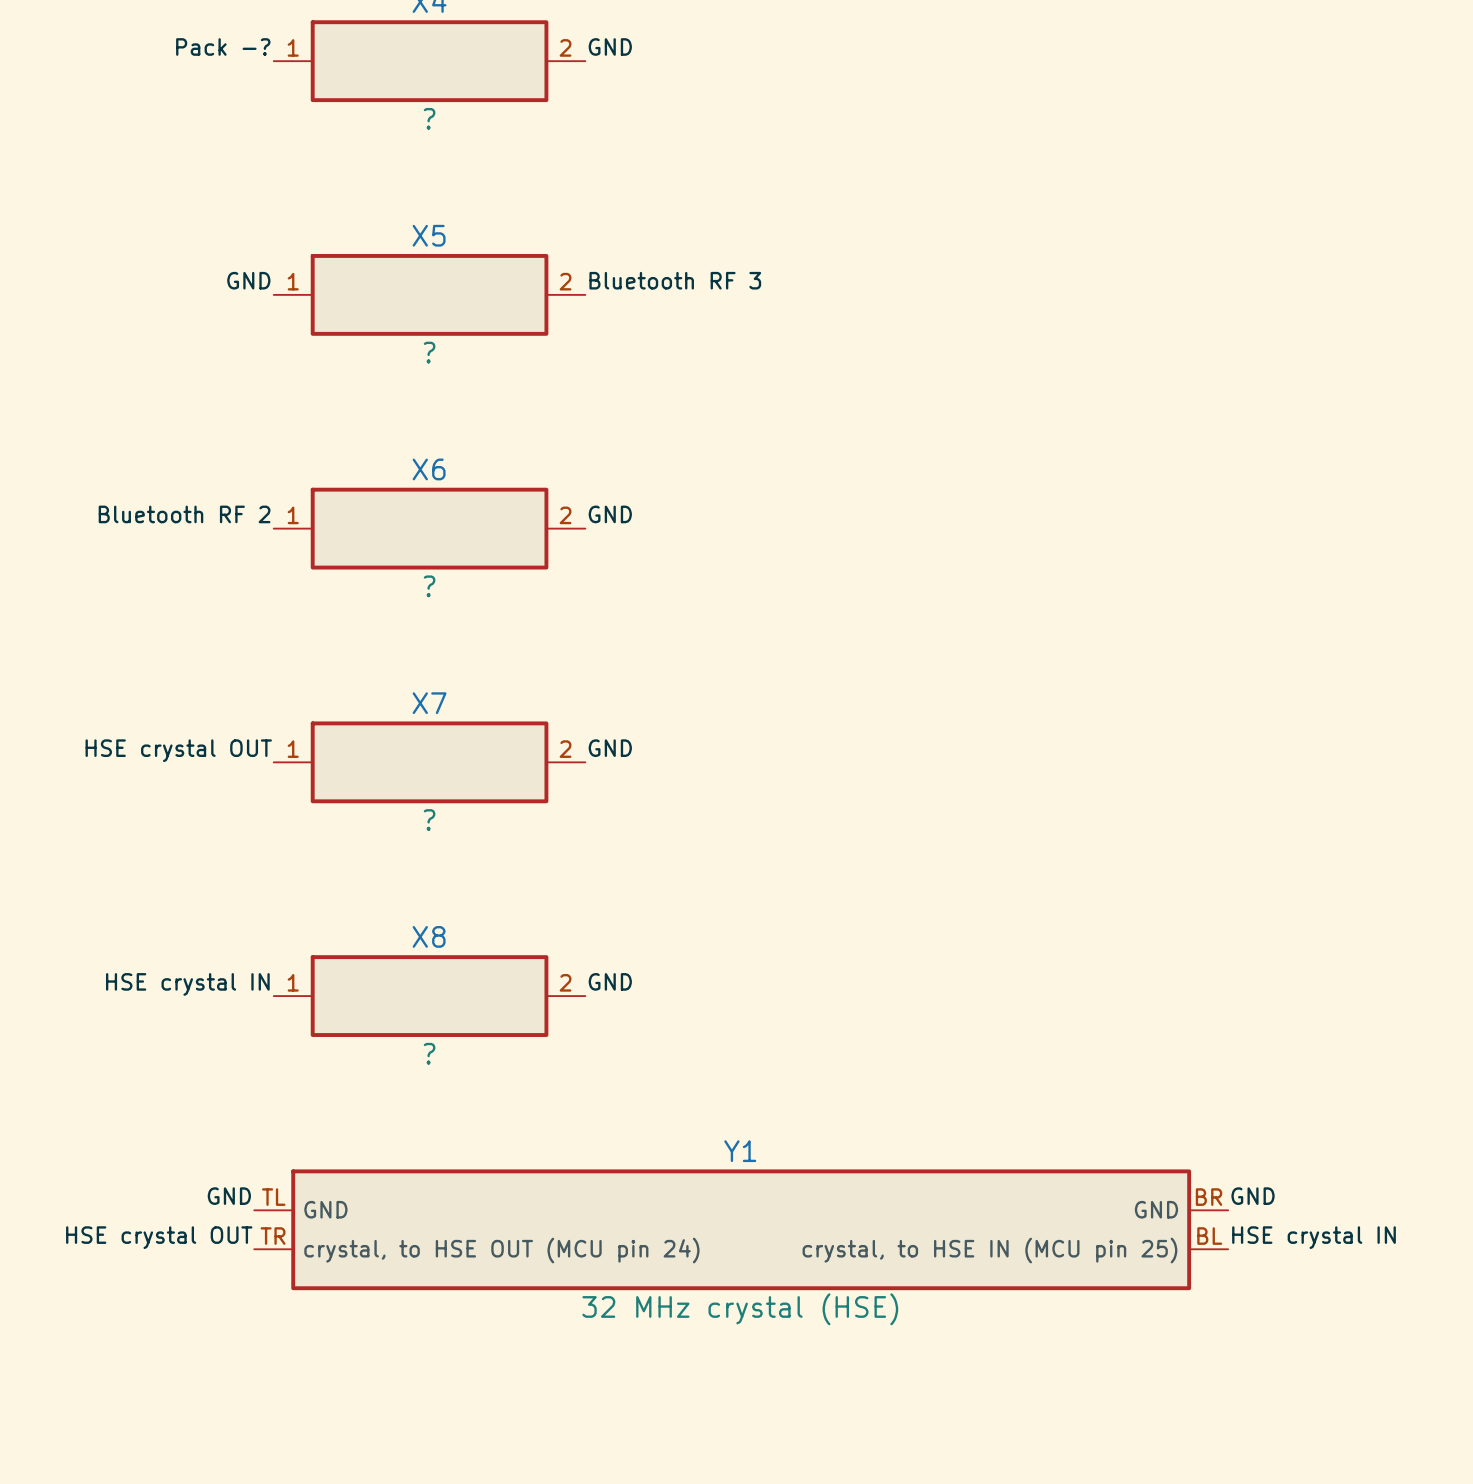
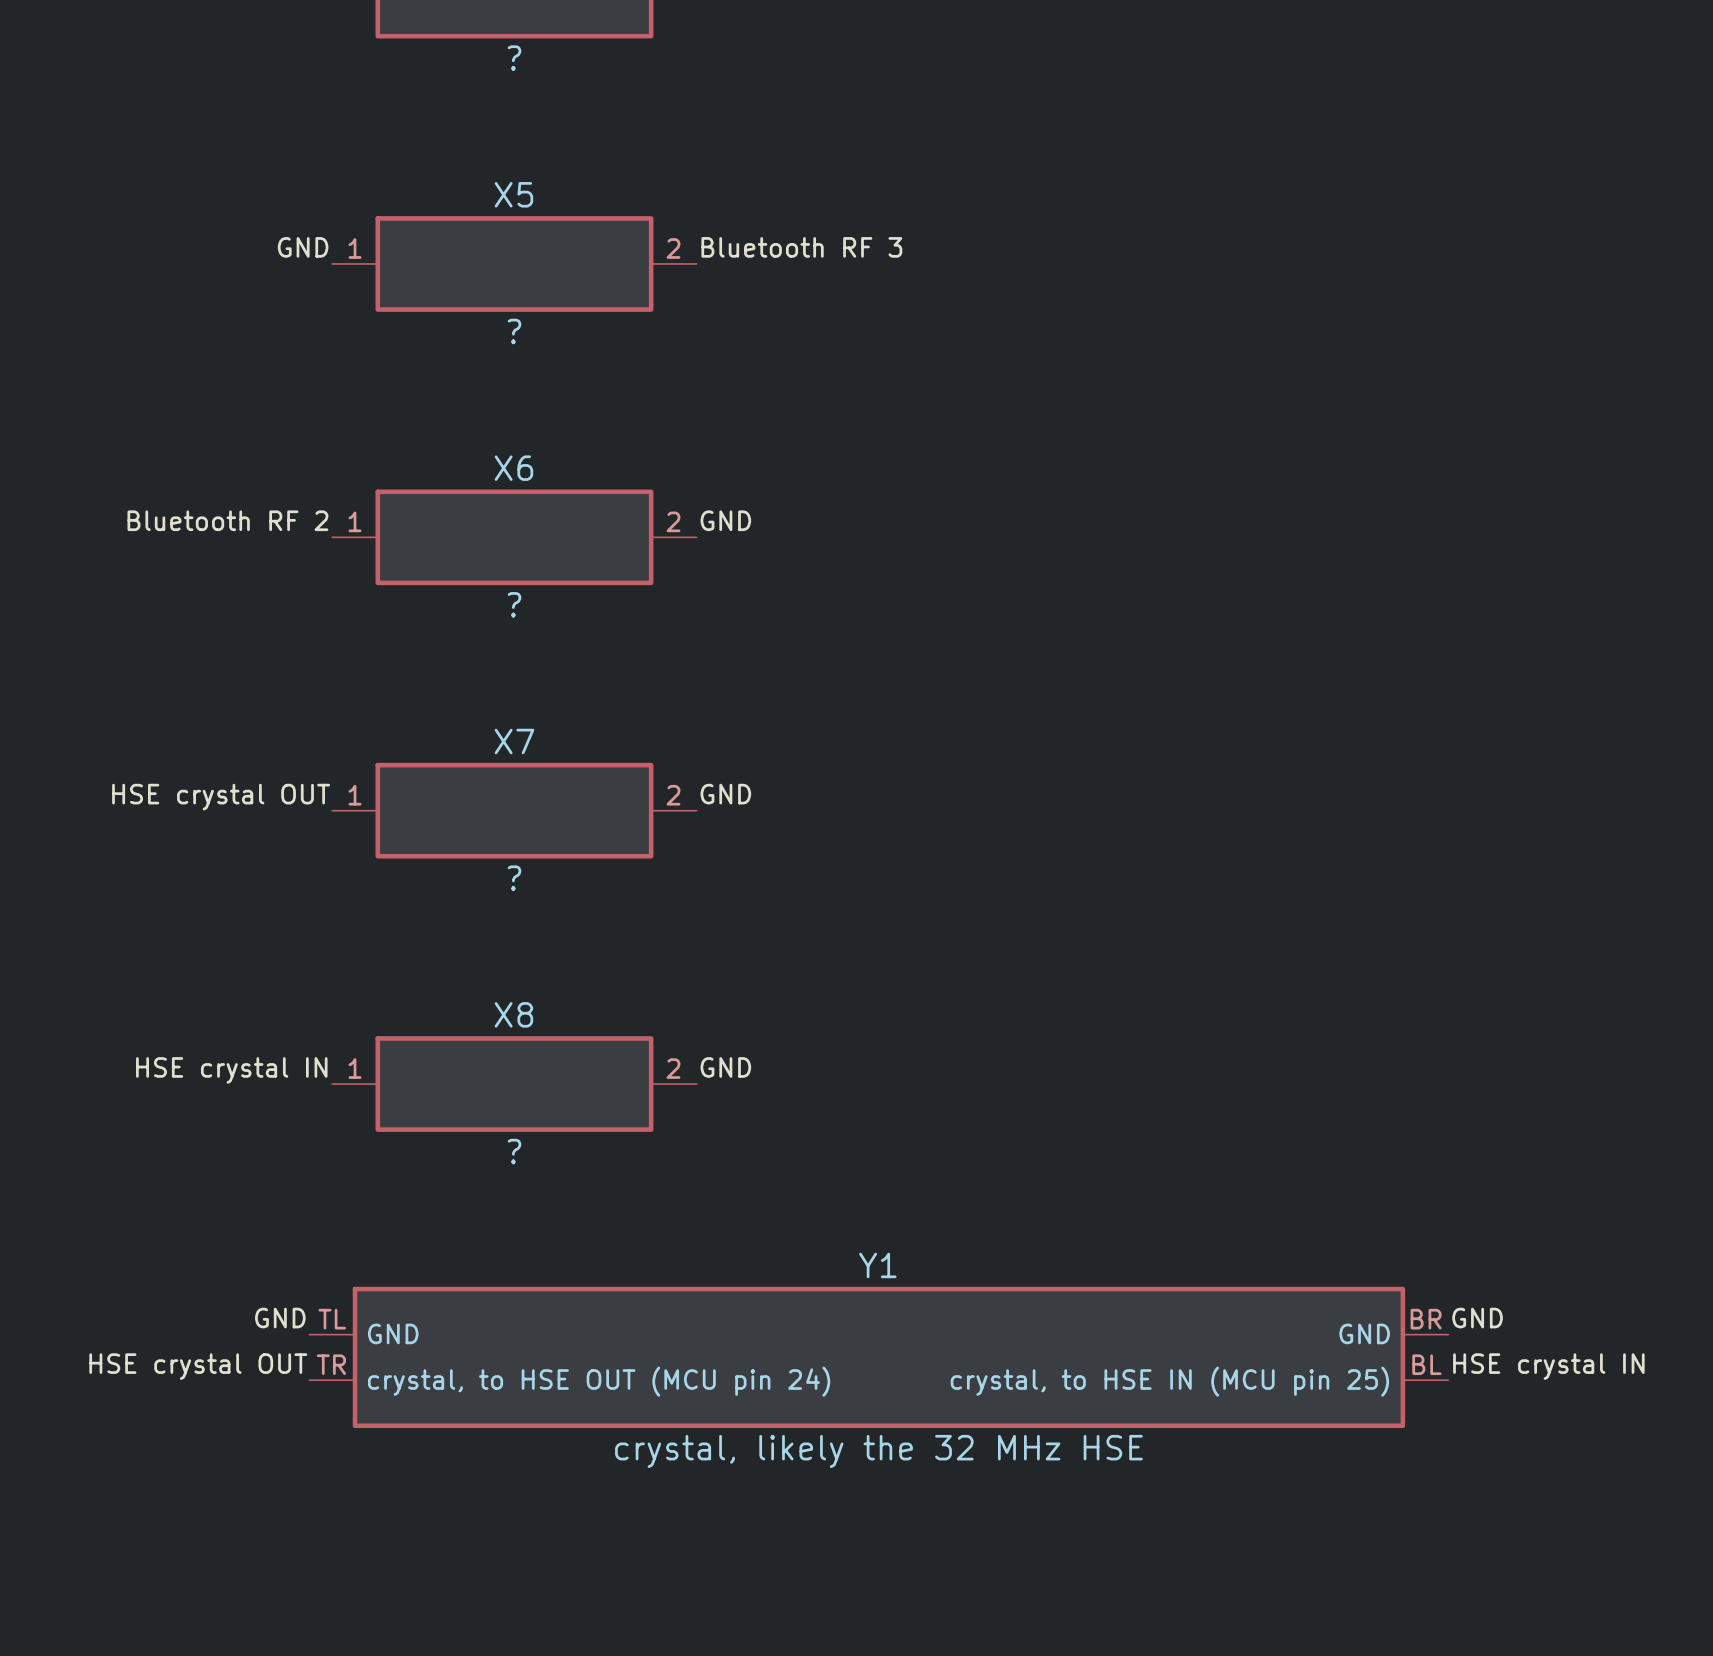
Y1 value: 32 MHz crystal (HSE) (740, 1309) -> crystal, likely the 32 MHz HSE (878, 1451)

